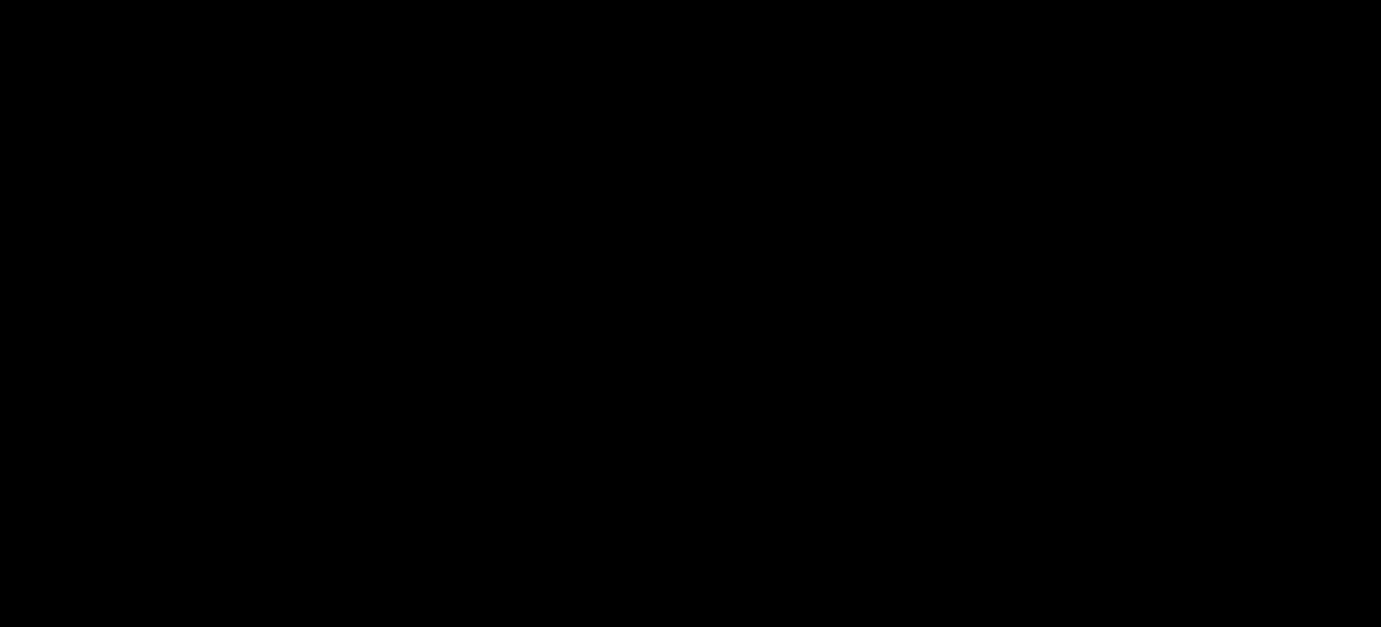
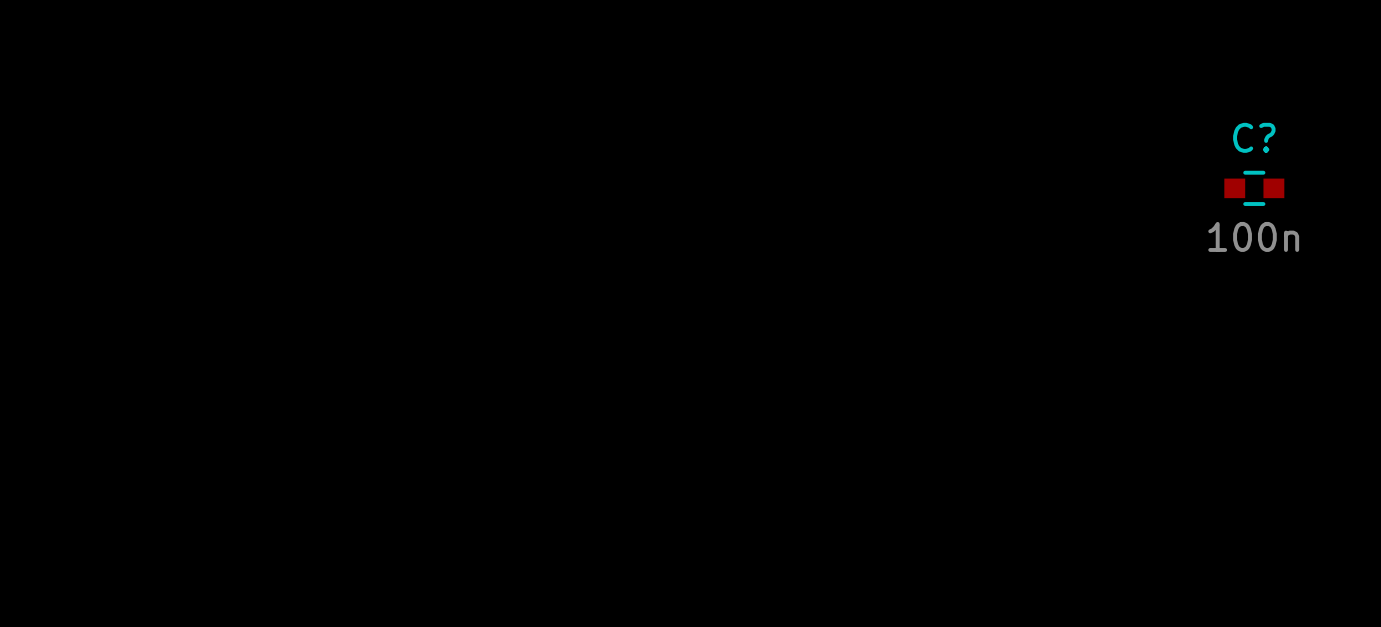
C?: none -> 100n (1254, 188)

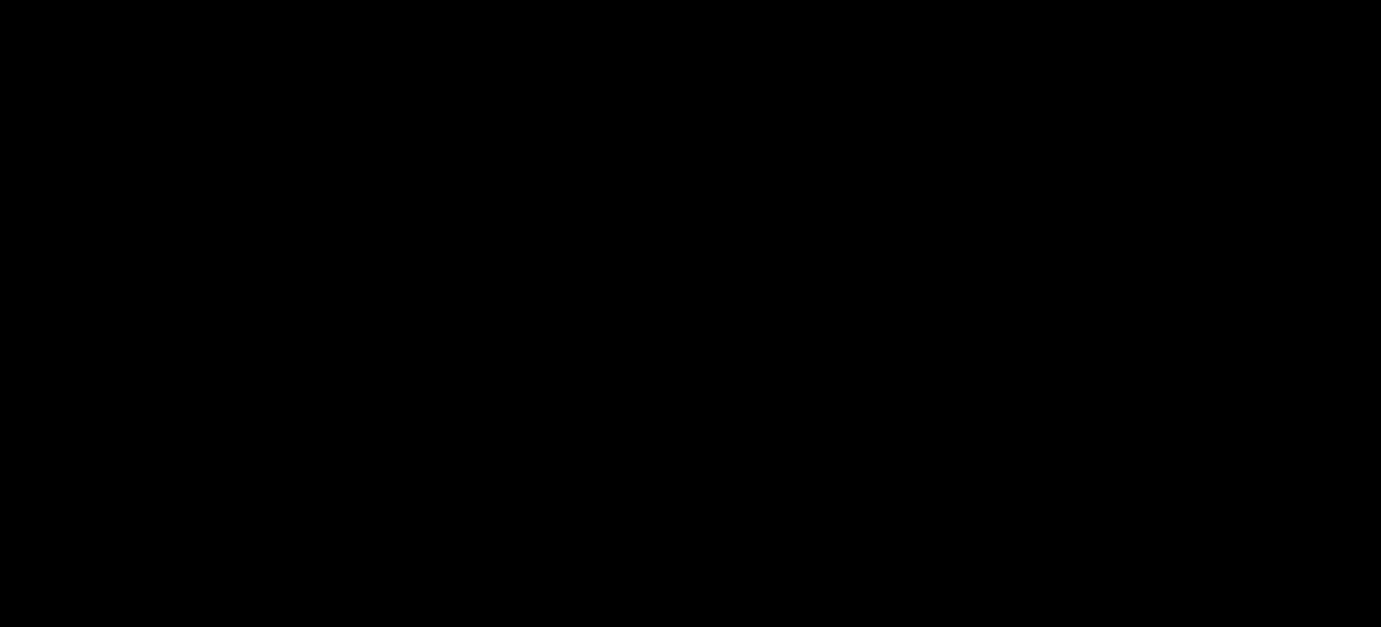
C?: 100n (1254, 188) -> none

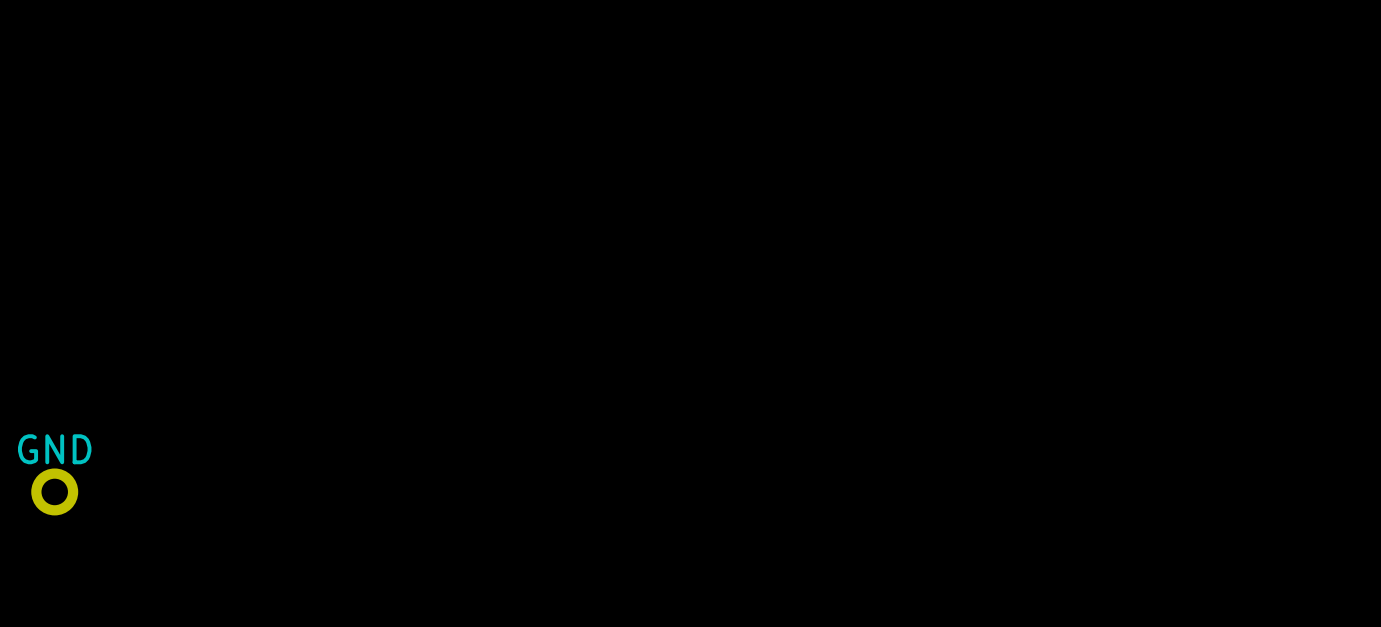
part: none -> GND (54, 491)

